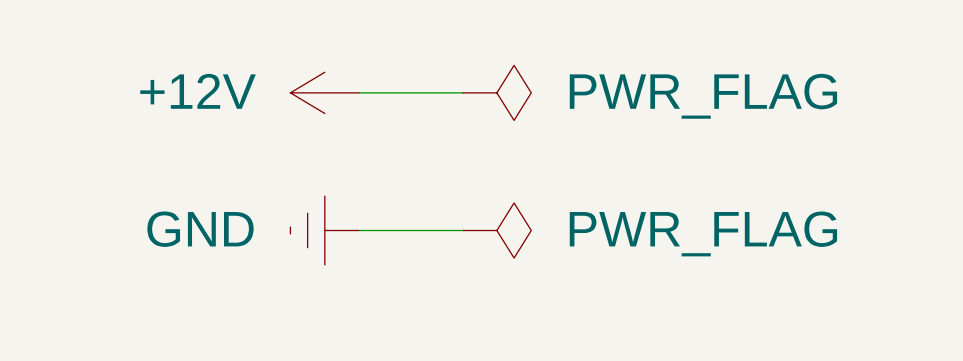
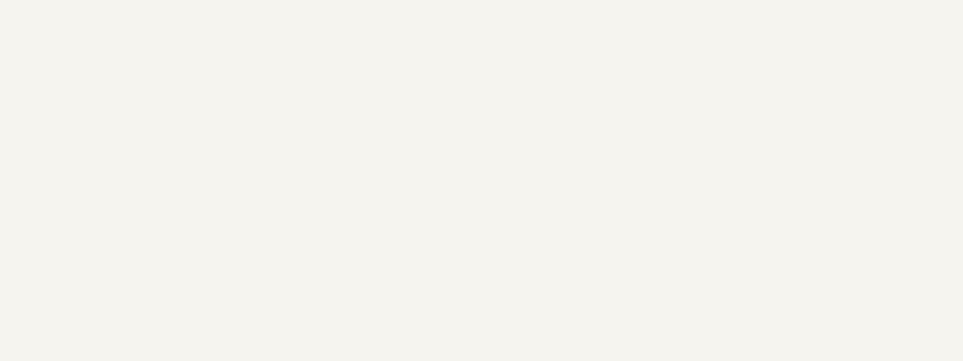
power symbol: +12V (324, 92) -> none
wire: (359, 92) (462, 92) -> none
power symbol: PWR_FLAG (496, 92) -> none
power symbol: GND (324, 230) -> none
wire: (359, 230) (462, 230) -> none
power symbol: PWR_FLAG (496, 230) -> none

